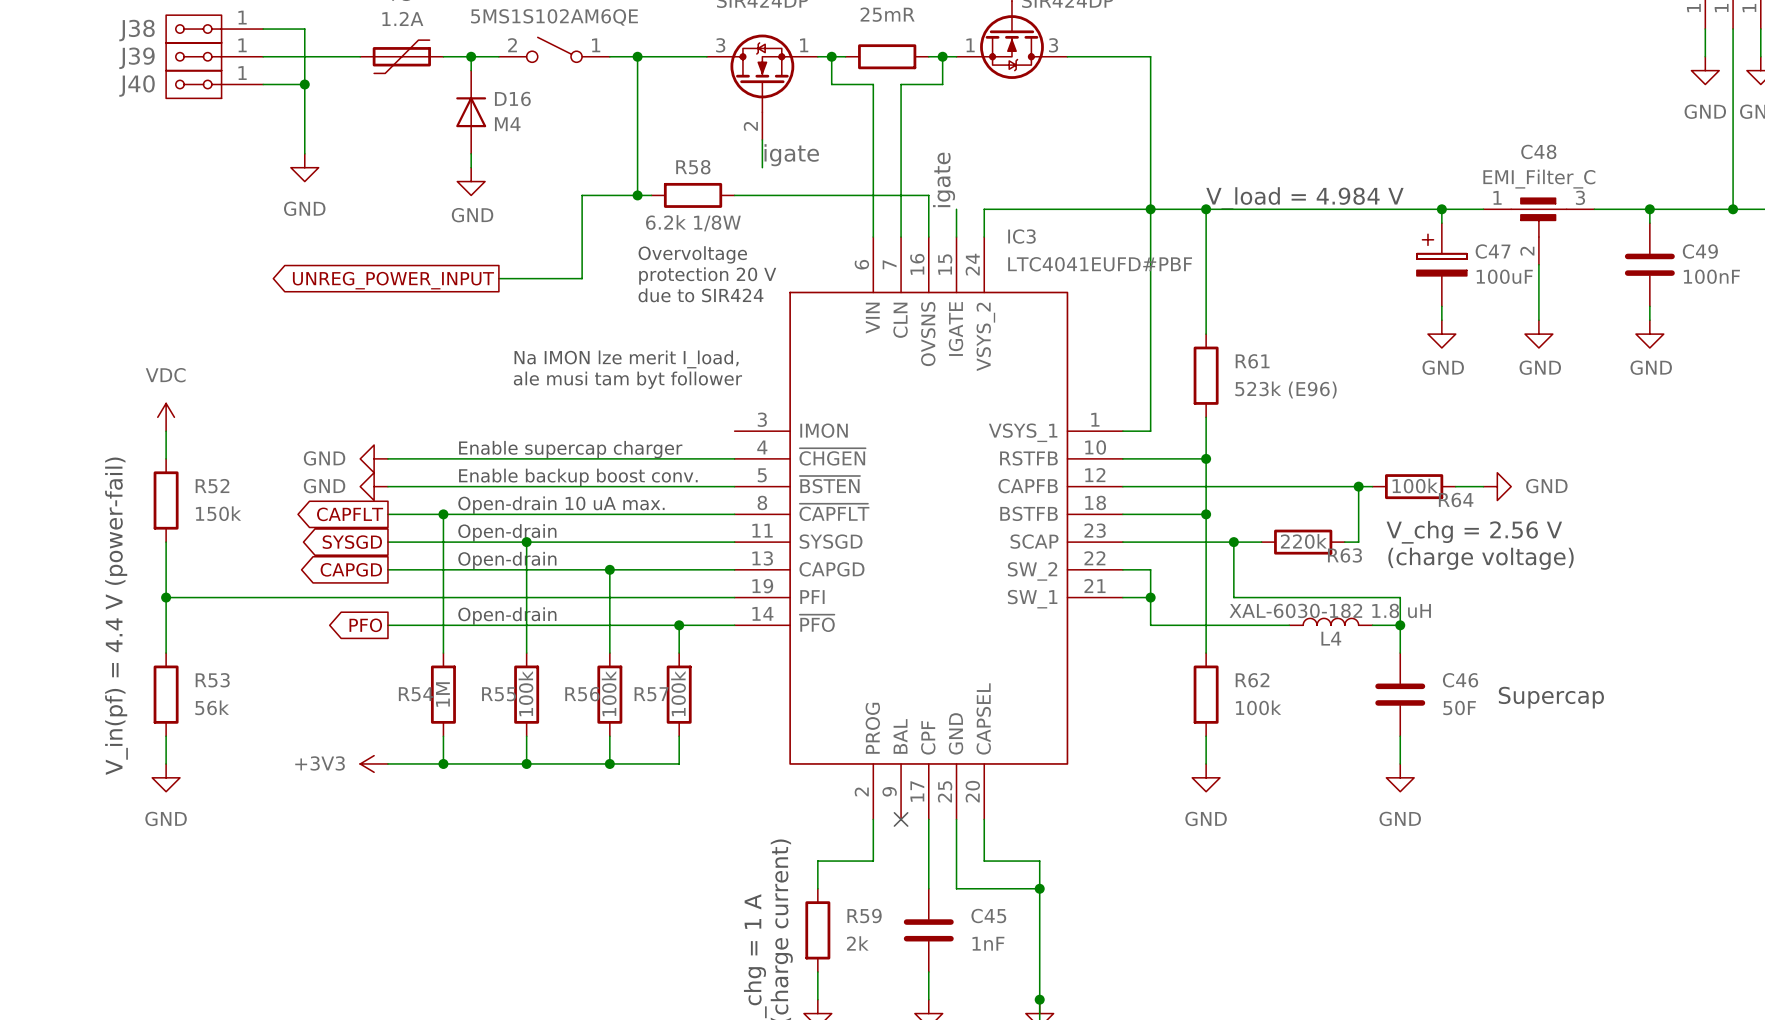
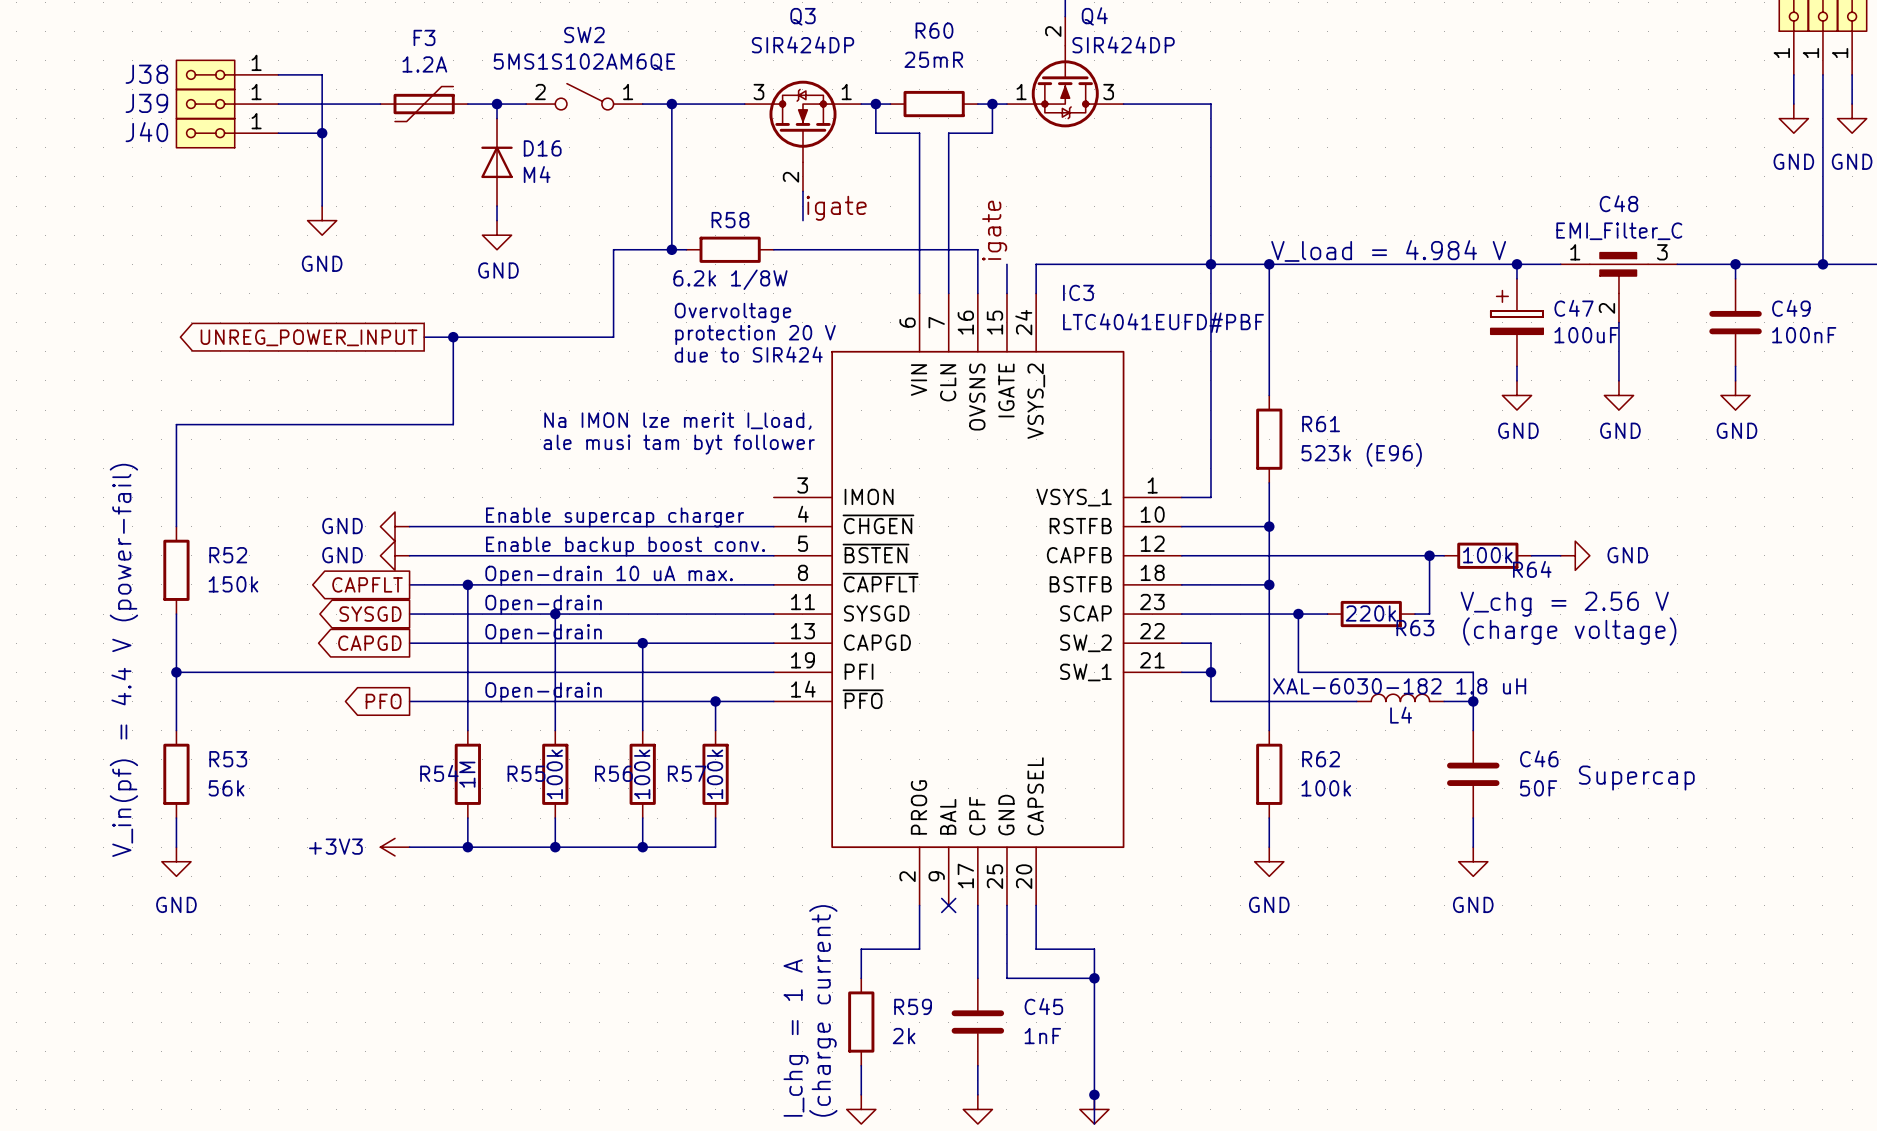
wire: none -> (424, 337) (526, 337)
wire: none -> (453, 337) (453, 424) (176, 424) (176, 497)
junction: none -> (453, 337)
global label position: UNREG_POWER_INPUT (393, 280) -> UNREG_POWER_INPUT (309, 337)
power symbol: VDC (166, 417) -> none

